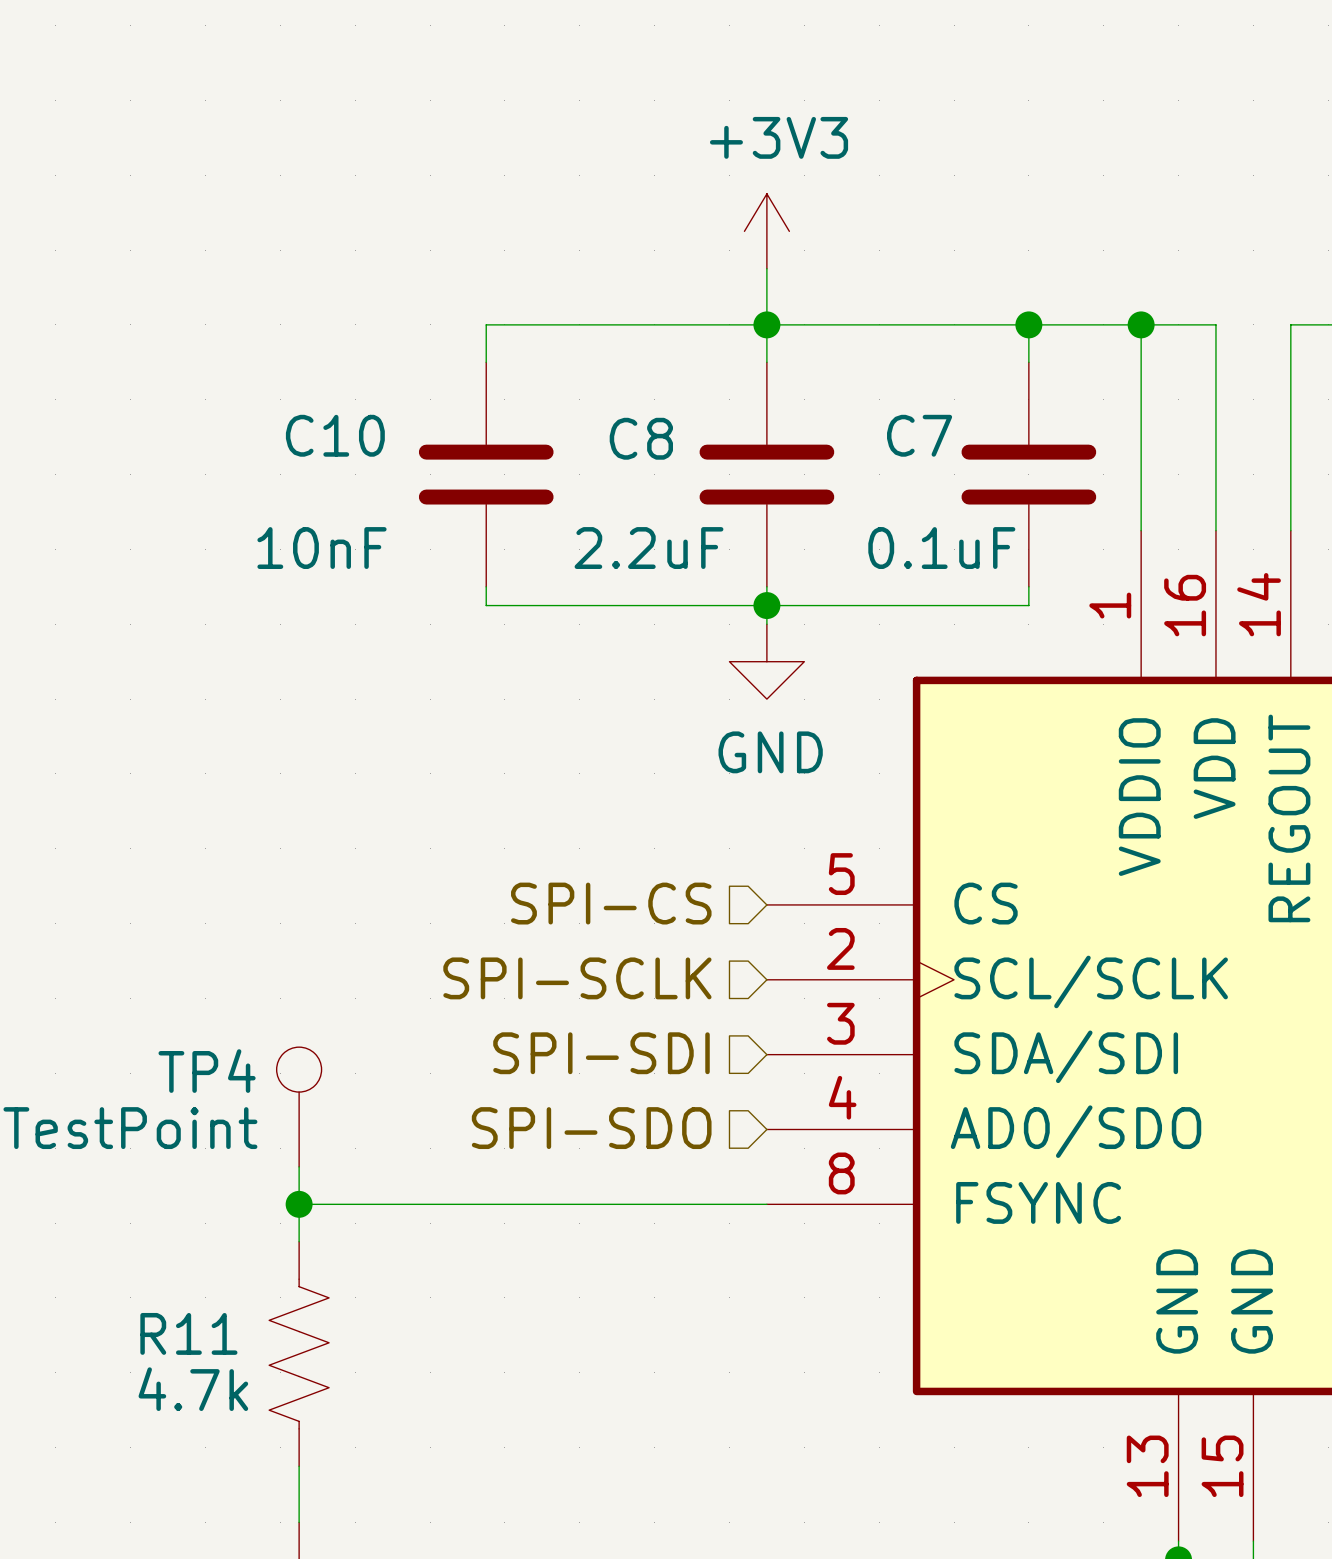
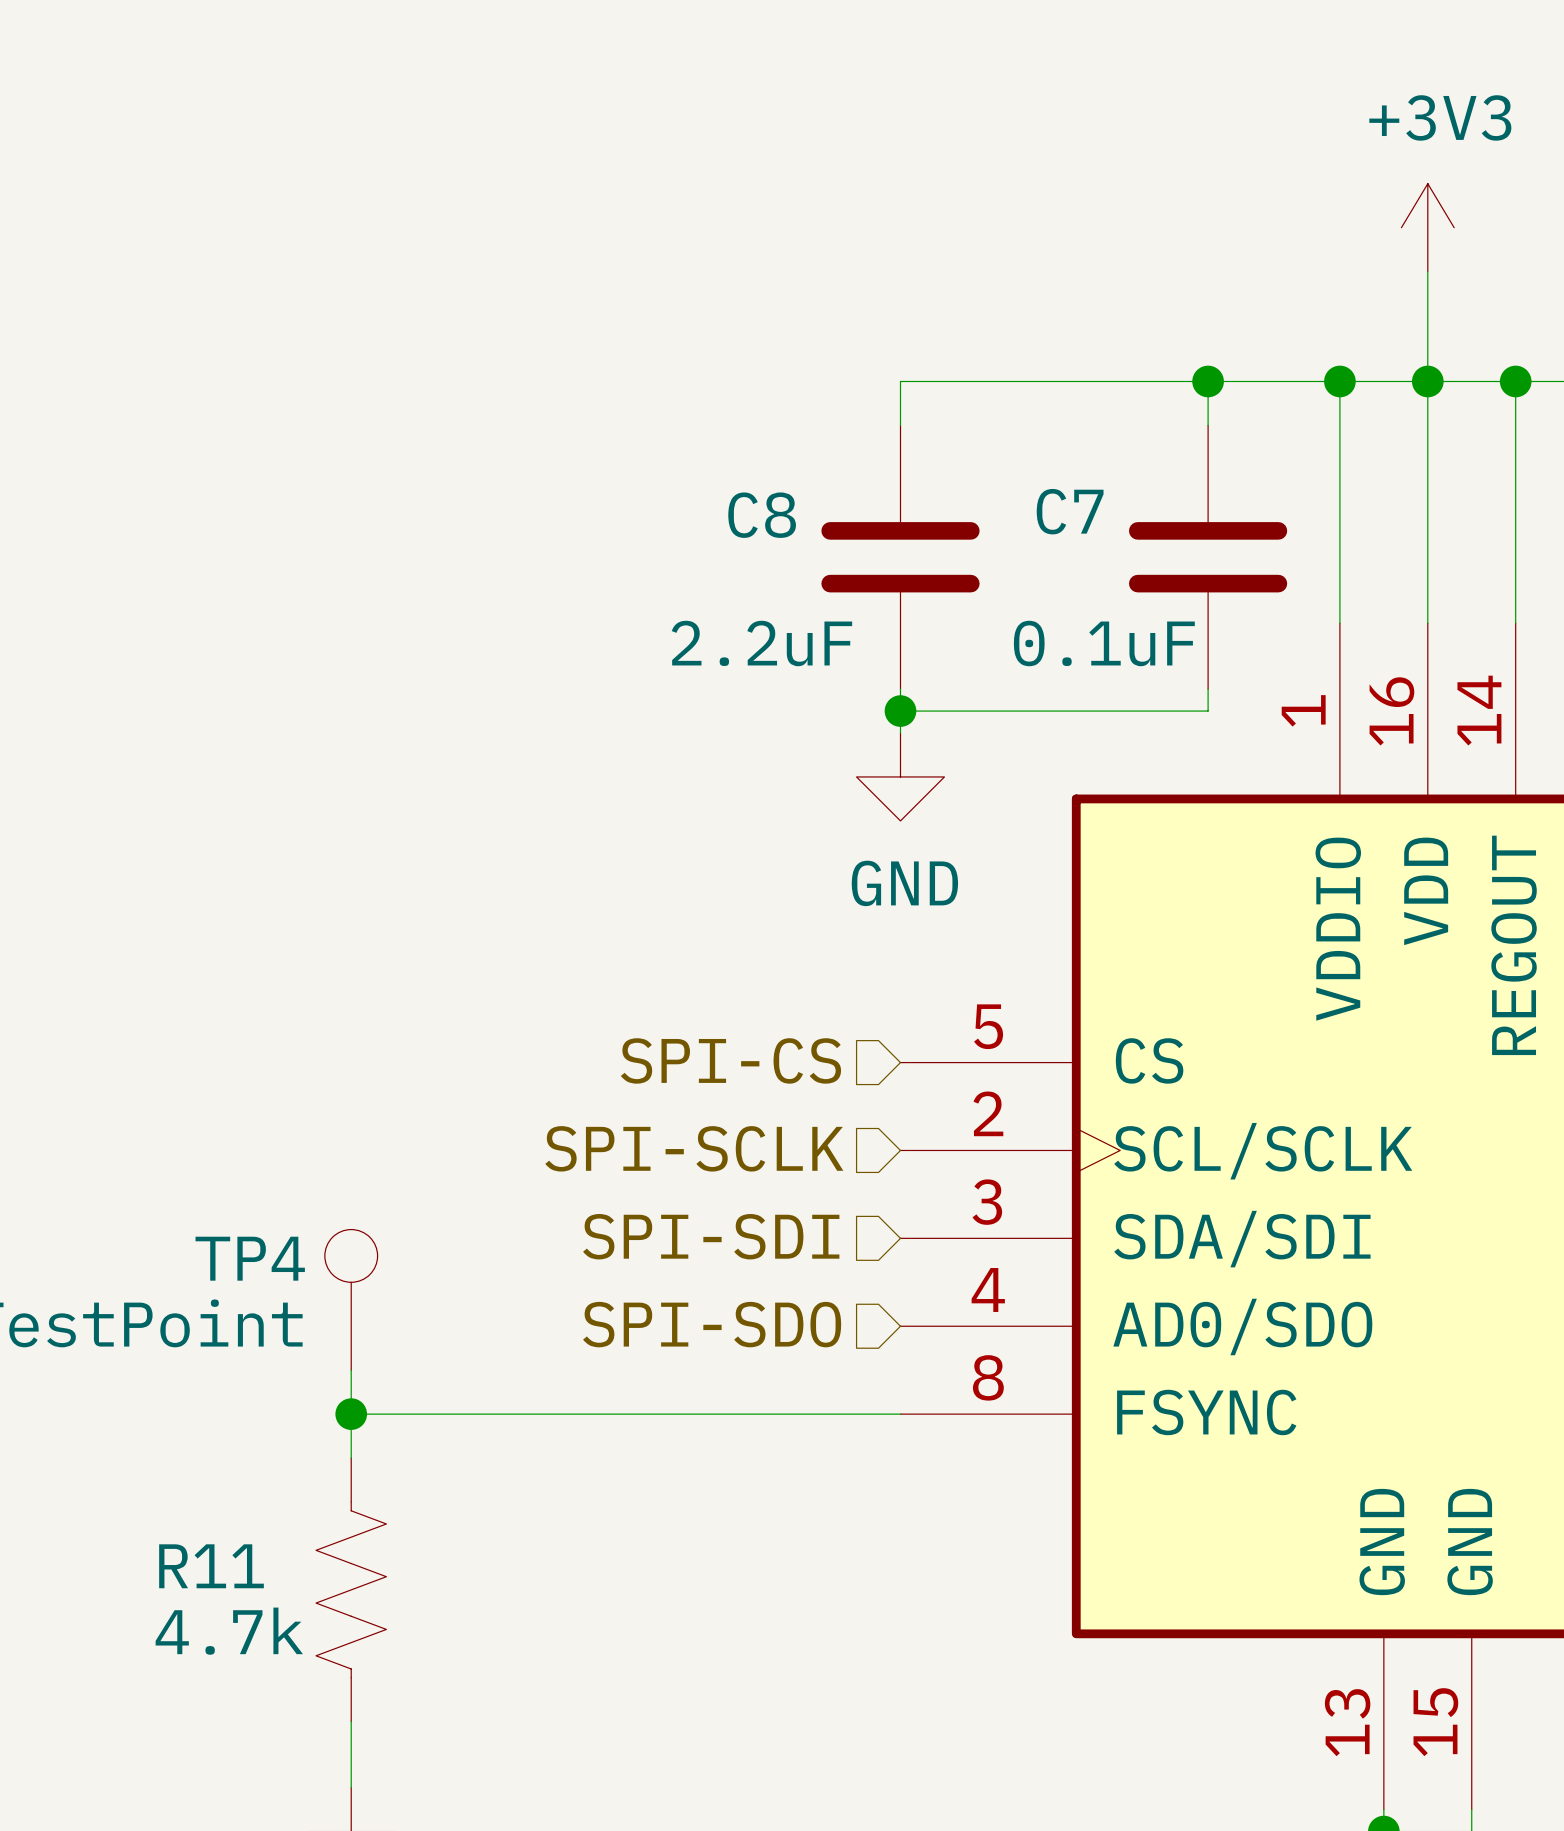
power symbol position: +3V3 (766, 231) -> +3V3 (1427, 227)
wire: none -> (1427, 271) (1427, 381) (1515, 381)
wire: (766, 268) (766, 324) (486, 324) (486, 362) -> none
junction: (766, 324) -> none
junction: none -> (1427, 381)
junction: none -> (1515, 381)
C10: 10nF (486, 474) -> none
wire: (486, 586) (486, 605) (766, 605) -> none

